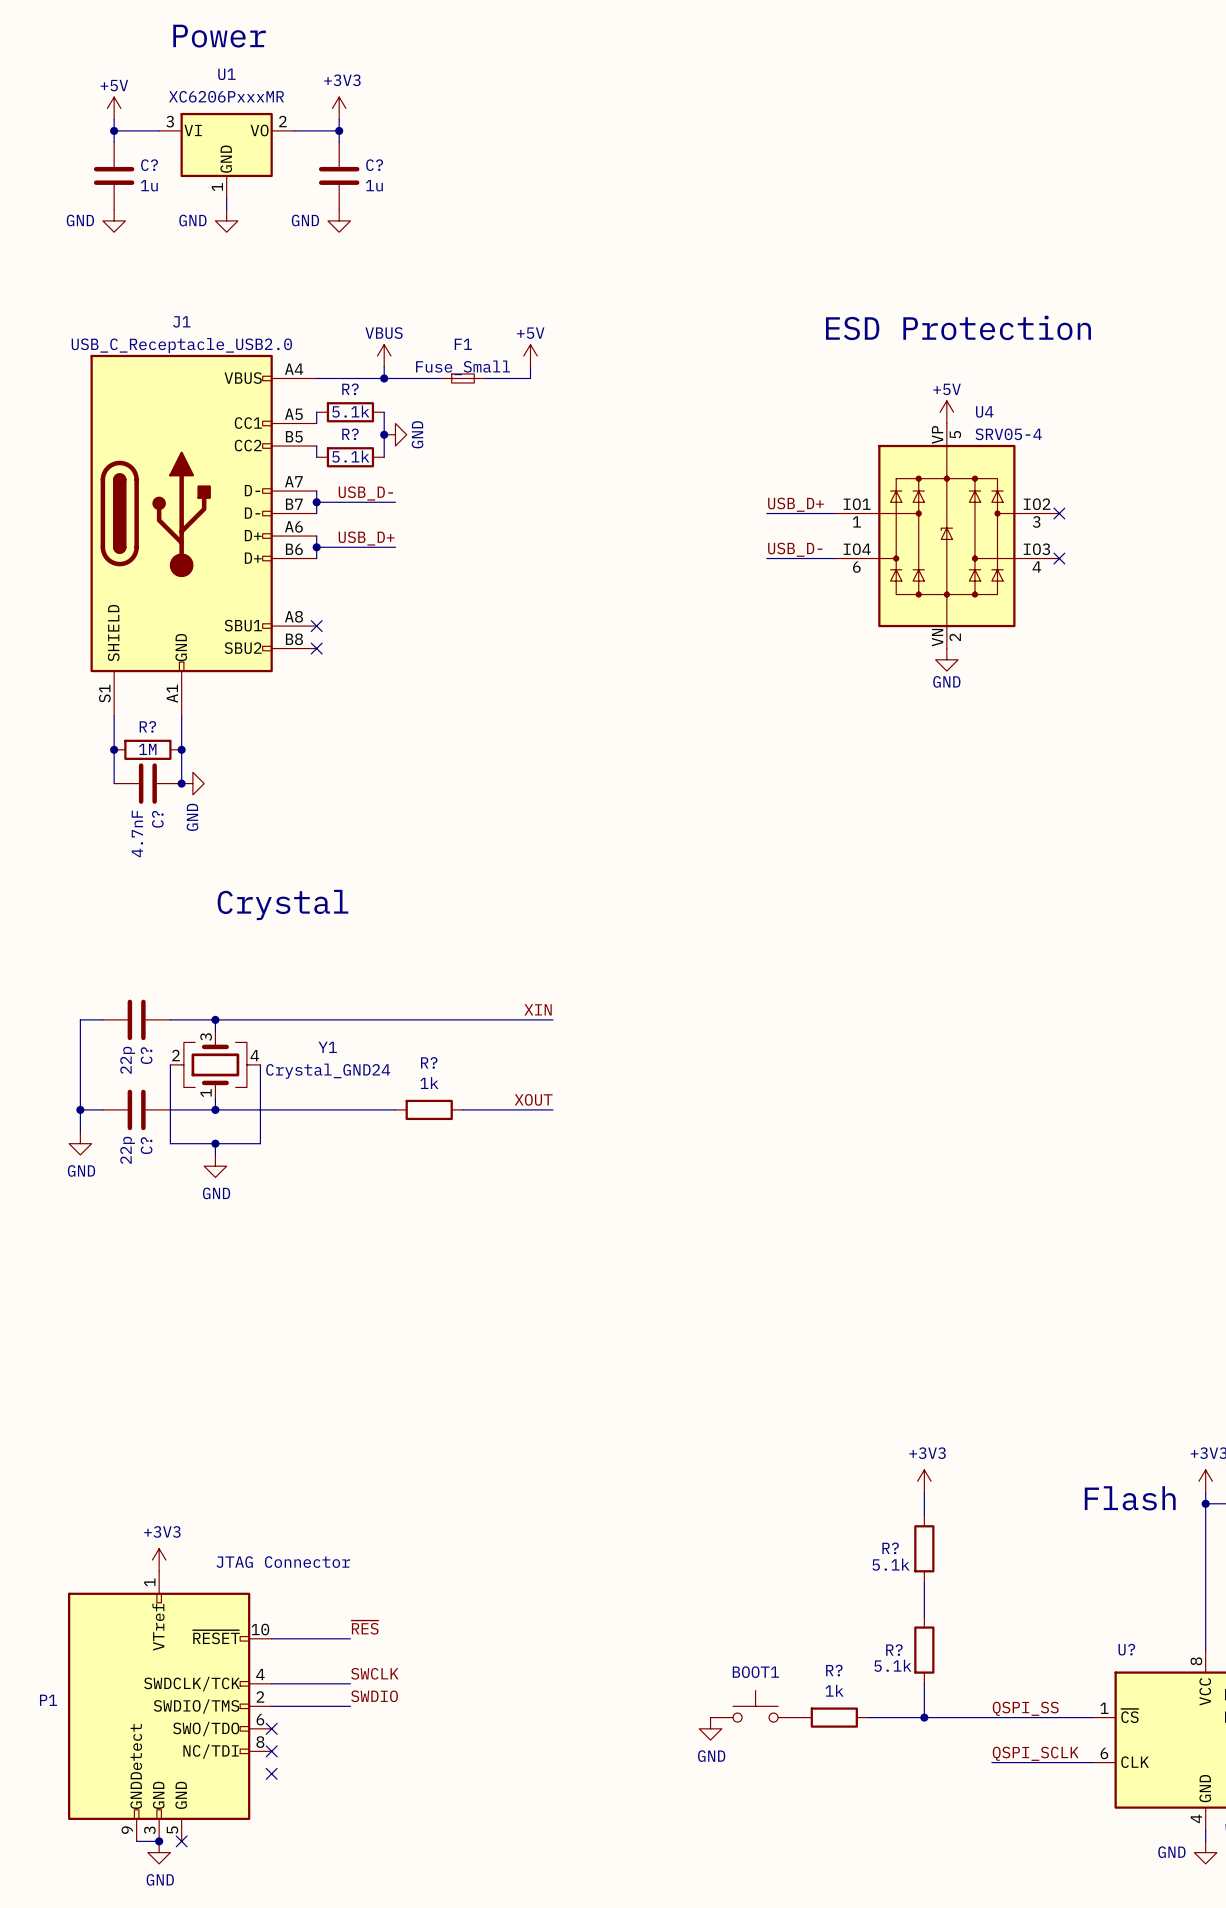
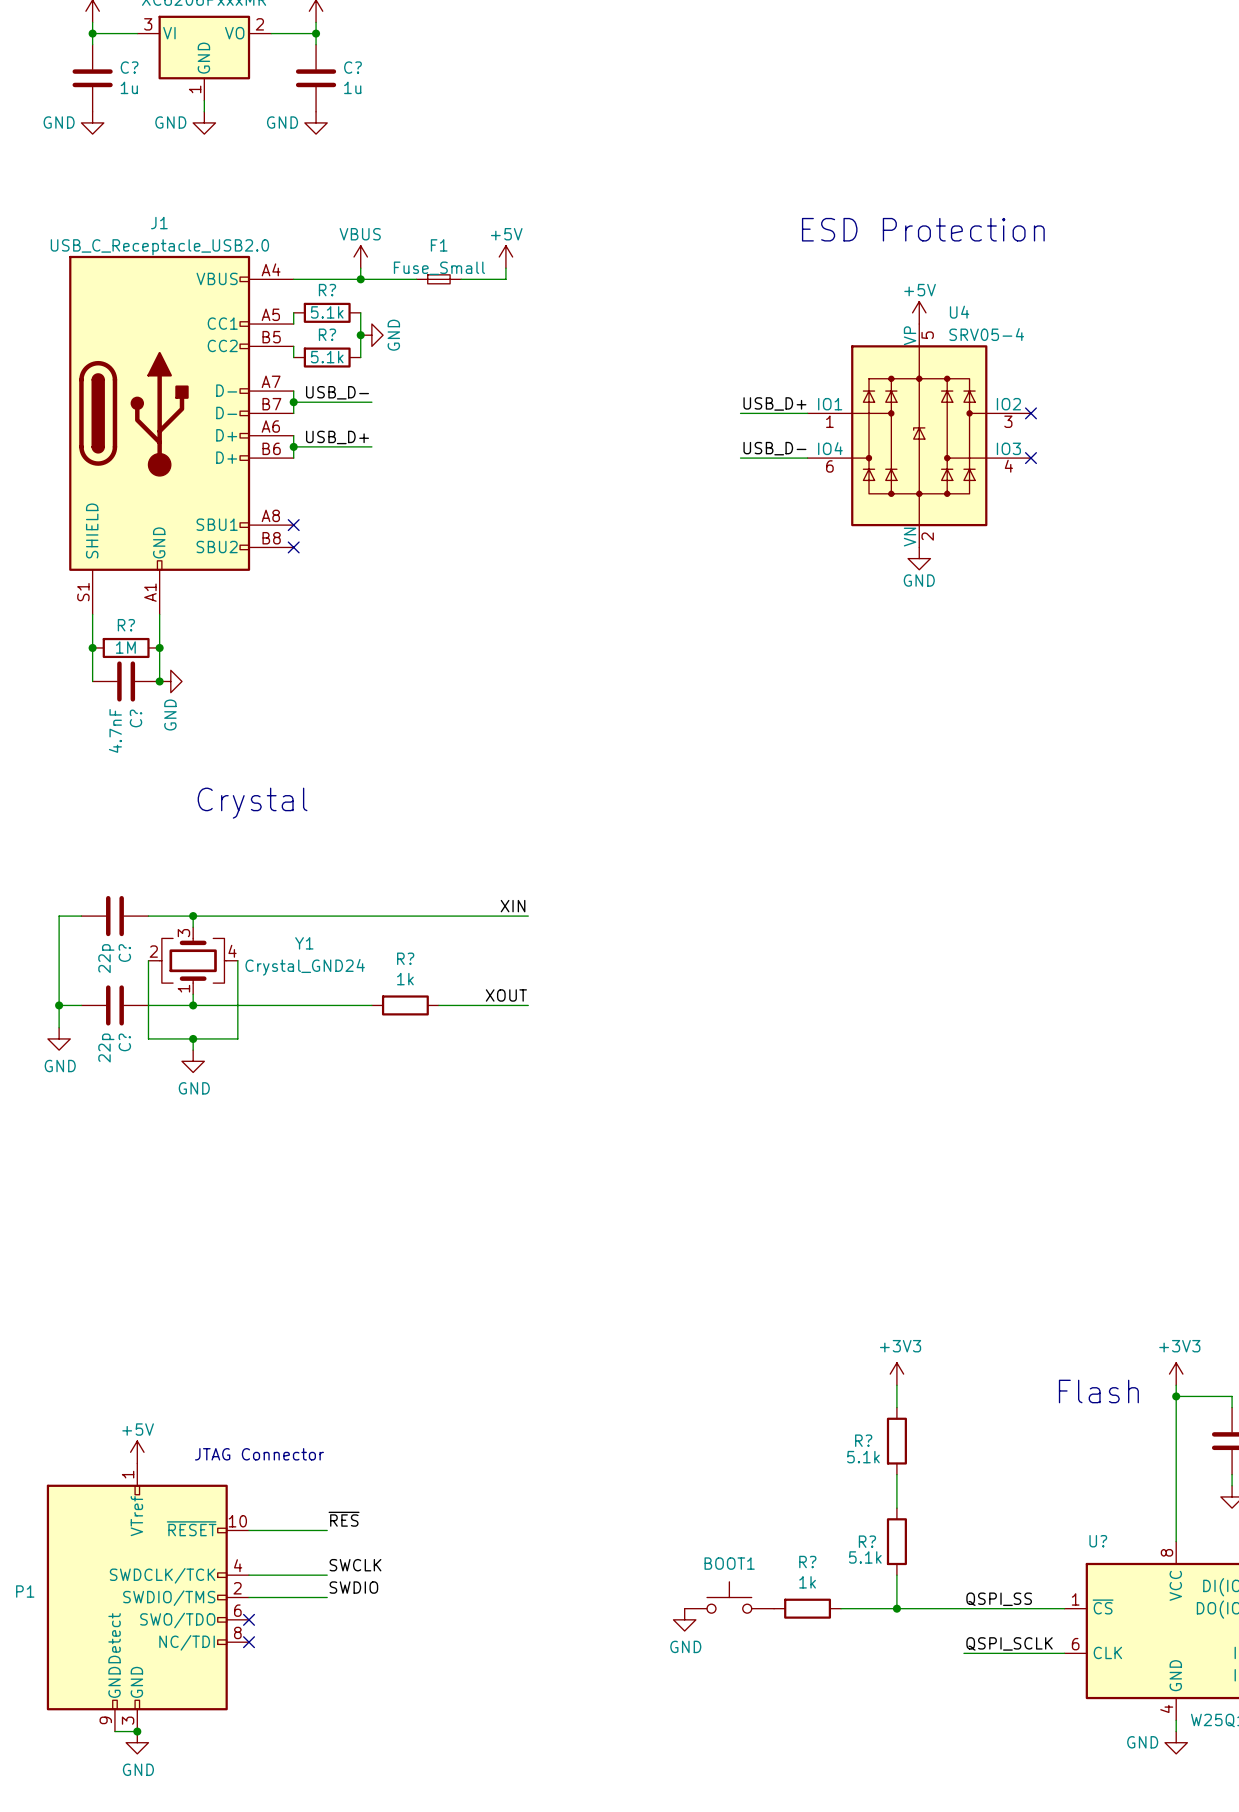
power symbol: +3V3 (159, 1560) -> +5V (137, 1452)
P1 symbol: [68, 1571, 272, 1842] -> [46, 1463, 250, 1732]
no-connect mark: (271, 1773) -> none
no-connect mark: (181, 1841) -> none

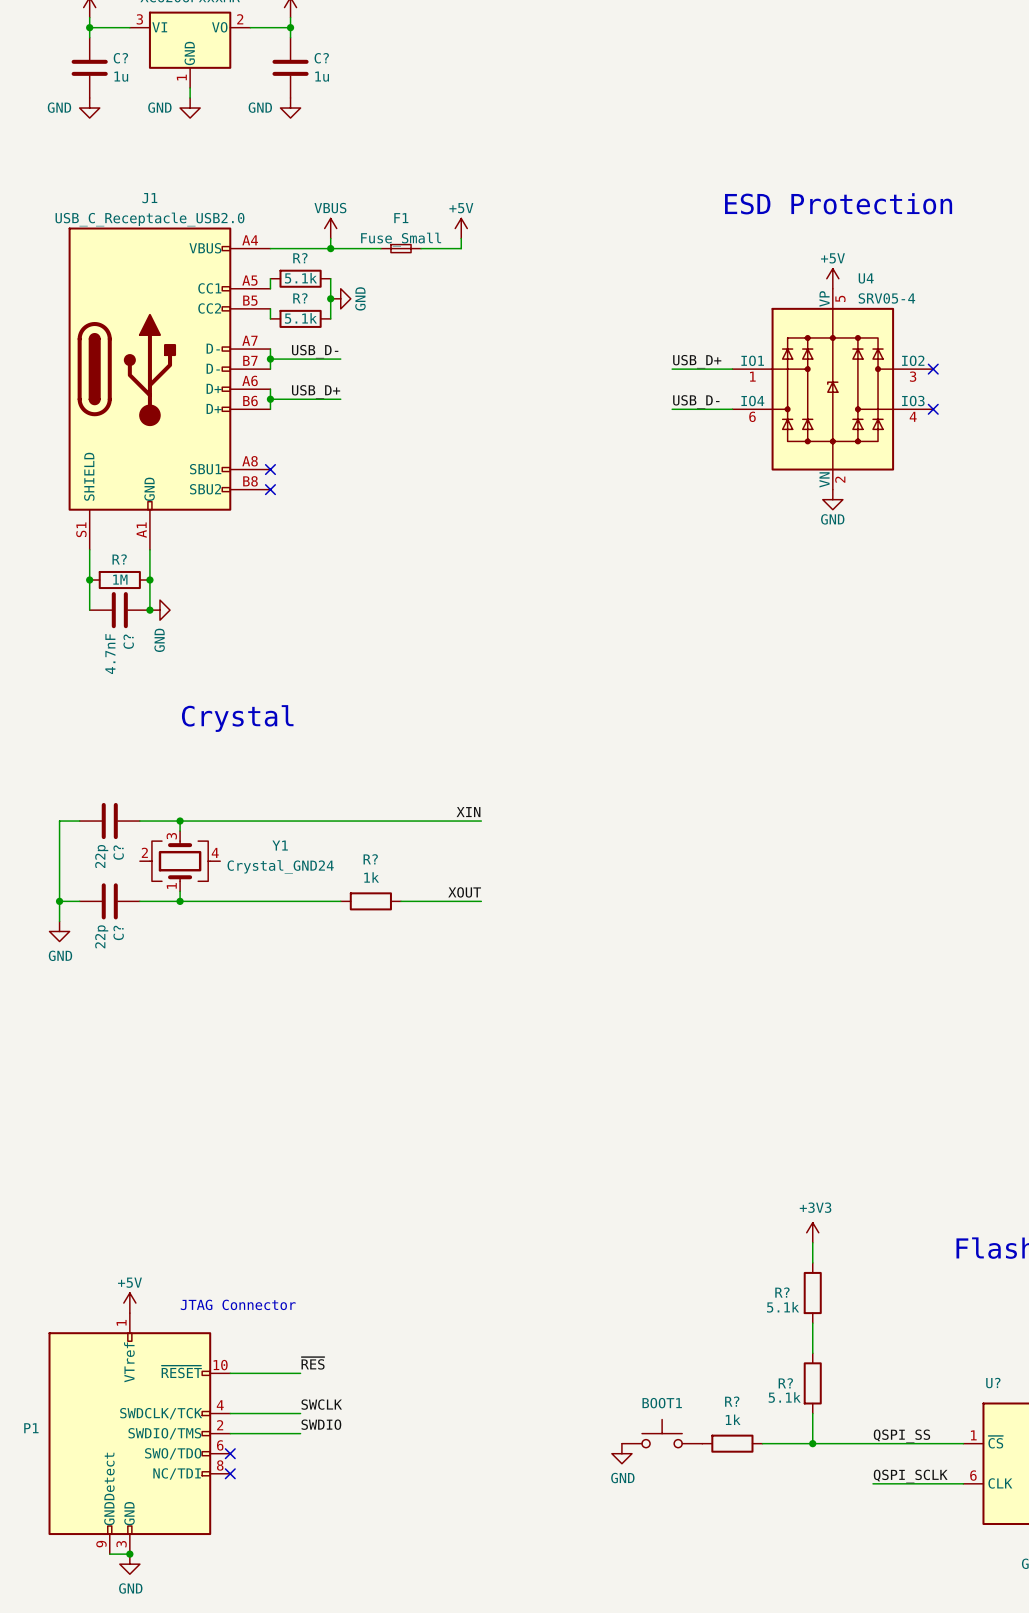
wire: (148, 960) (148, 1038) (237, 1038) (237, 960) -> none
wire: (193, 1038) (193, 1050) -> none
junction: (193, 1038) -> none
power symbol: GND (193, 1061) -> none

